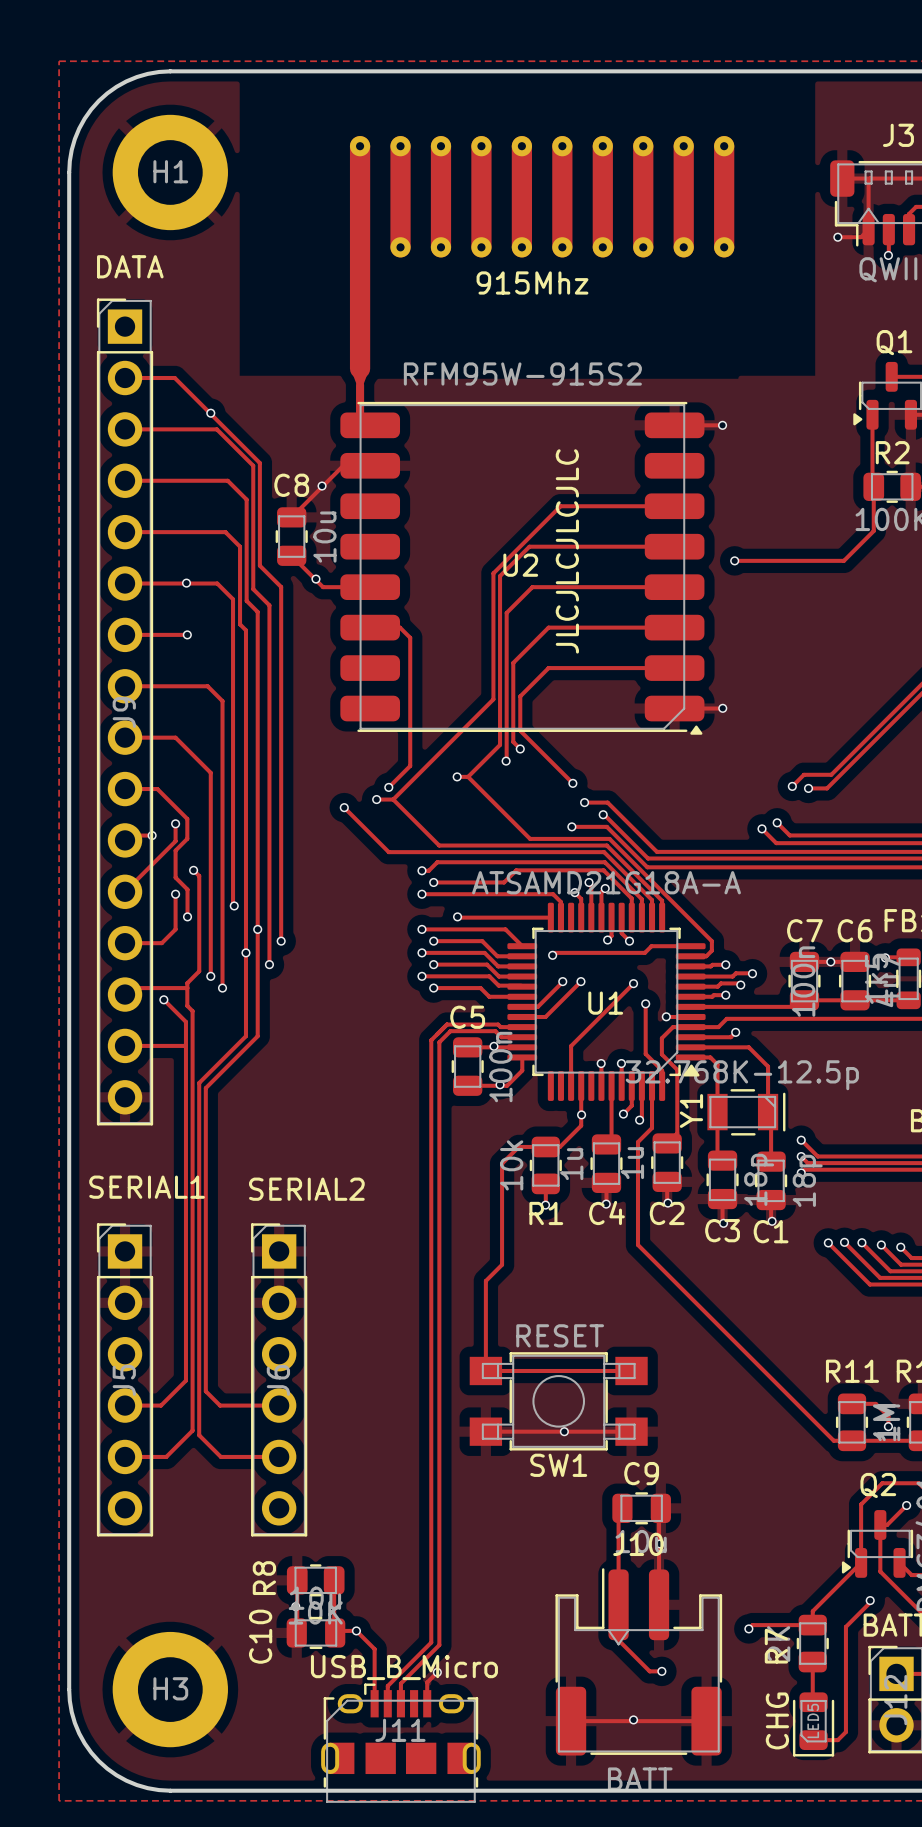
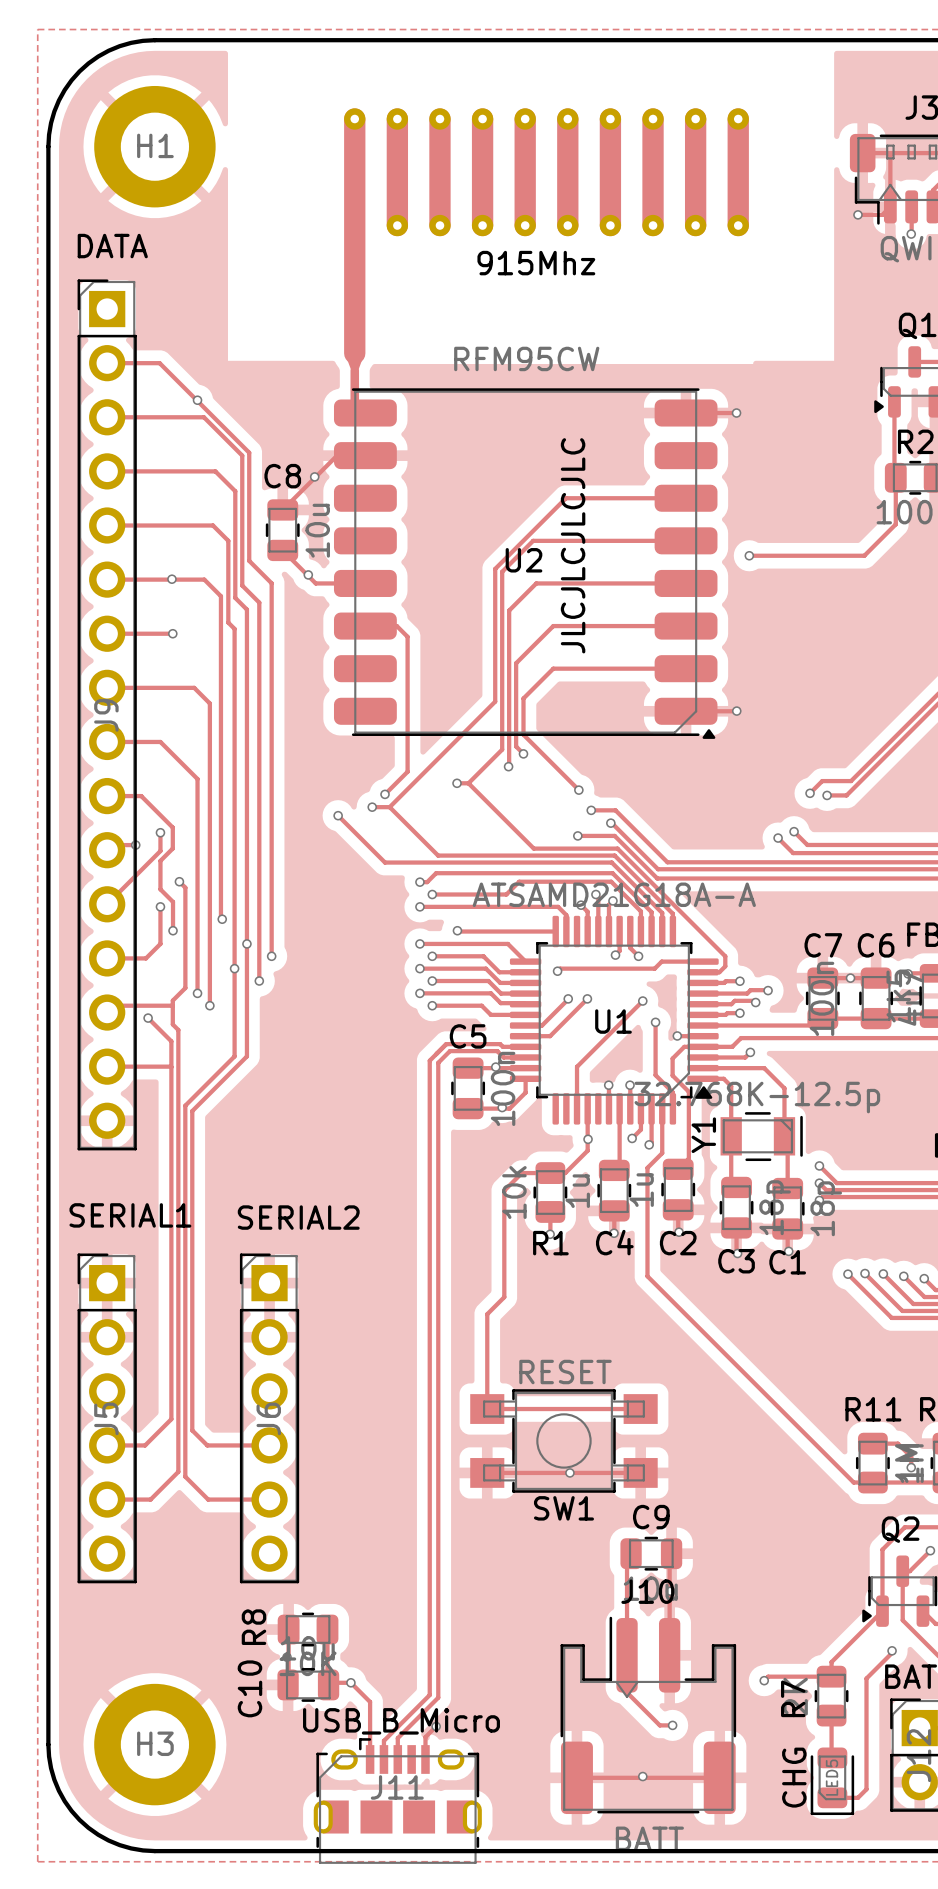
U2 value: RFM95W-915S2 (522, 374) -> RFM95CW (526, 358)

